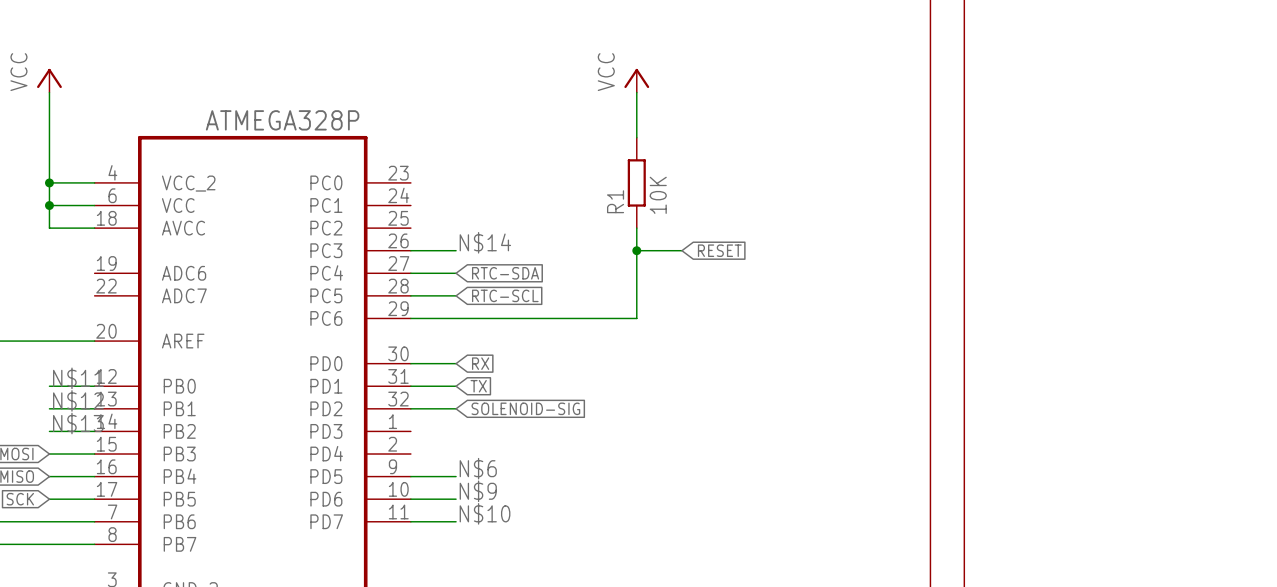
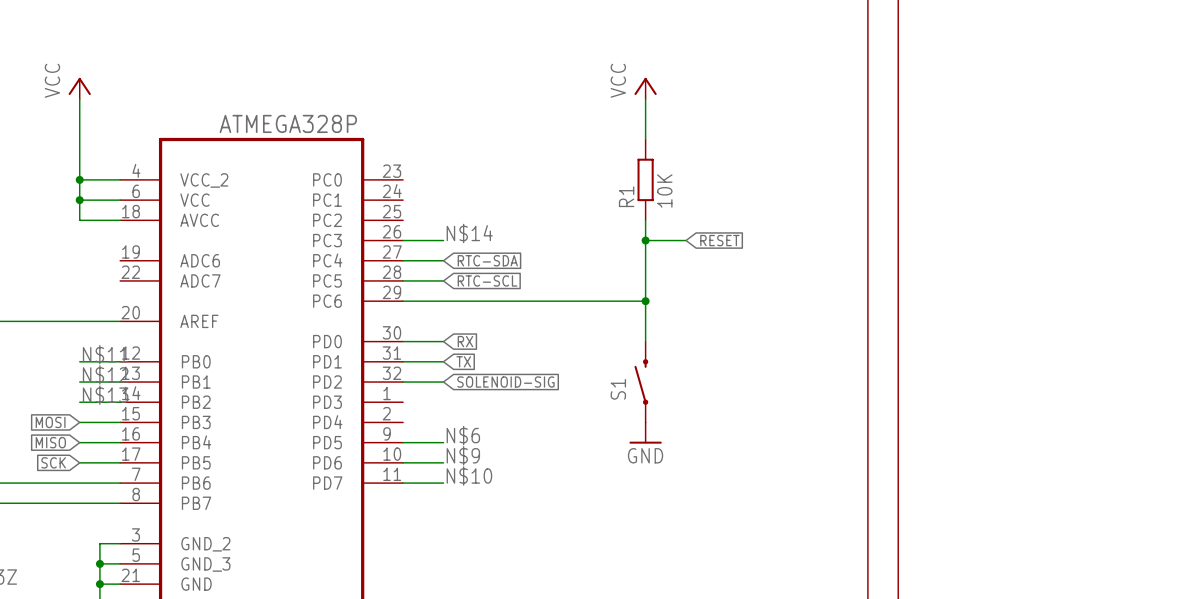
power symbol position: VCC (636, 80) -> VCC (645, 88)
wire: (636, 92) (636, 137) -> (645, 99) (645, 139)
R1 position: (636, 182) -> (645, 179)
wire: (636, 228) (636, 318) -> (645, 301) (605, 301)
wire: none -> (645, 220) (645, 341)
wire: (636, 250) (681, 250) -> (686, 240) (645, 240)
junction: (636, 250) -> none
junction: none -> (645, 240)
global label position: RESET (719, 250) -> RESET (719, 240)
junction: none -> (645, 301)
S1: none -> (641, 382)
power symbol: none -> GND (645, 433)

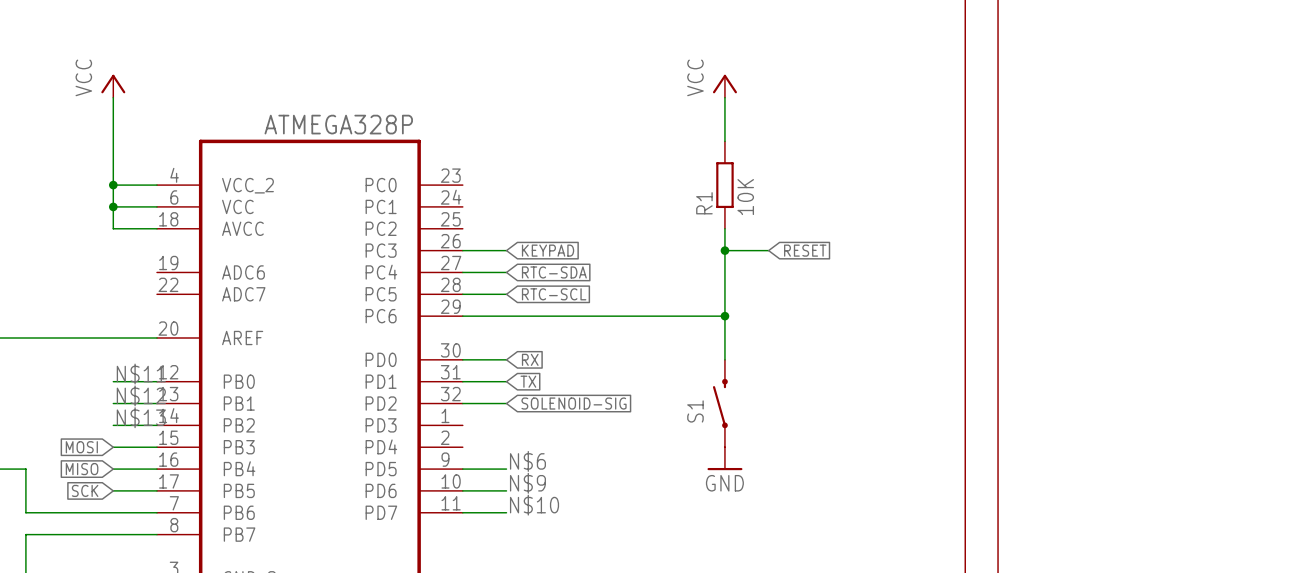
label: N$14 (469, 233) -> none
global label: none -> KEYPAD (548, 250)

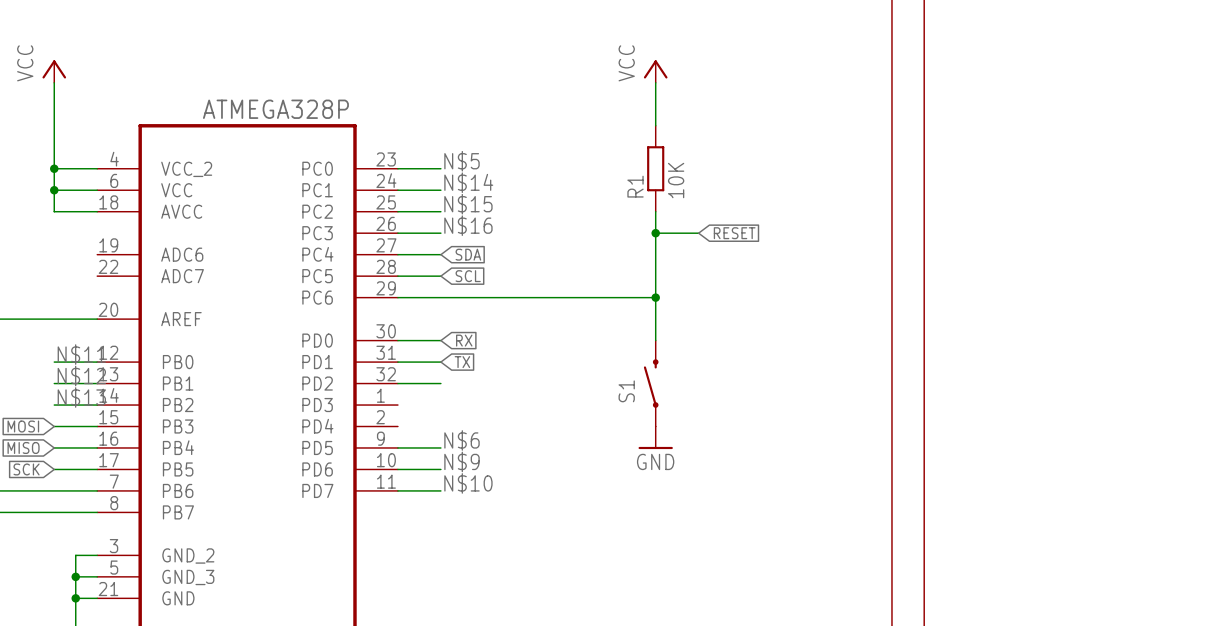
label: none -> N$5 (461, 161)
wire: none -> (397, 168) (440, 168)
label: none -> N$14 (468, 182)
wire: none -> (397, 190) (440, 190)
label: none -> N$15 (468, 204)
wire: none -> (397, 211) (440, 211)
label: none -> N$16 (468, 225)
global label: KEYPAD (548, 250) -> none
global label: RTC-SDA (554, 272) -> SDA (468, 254)
global label: RTC-SCL (554, 294) -> SCL (468, 276)
global label: SOLENOID-SIG (574, 403) -> none

